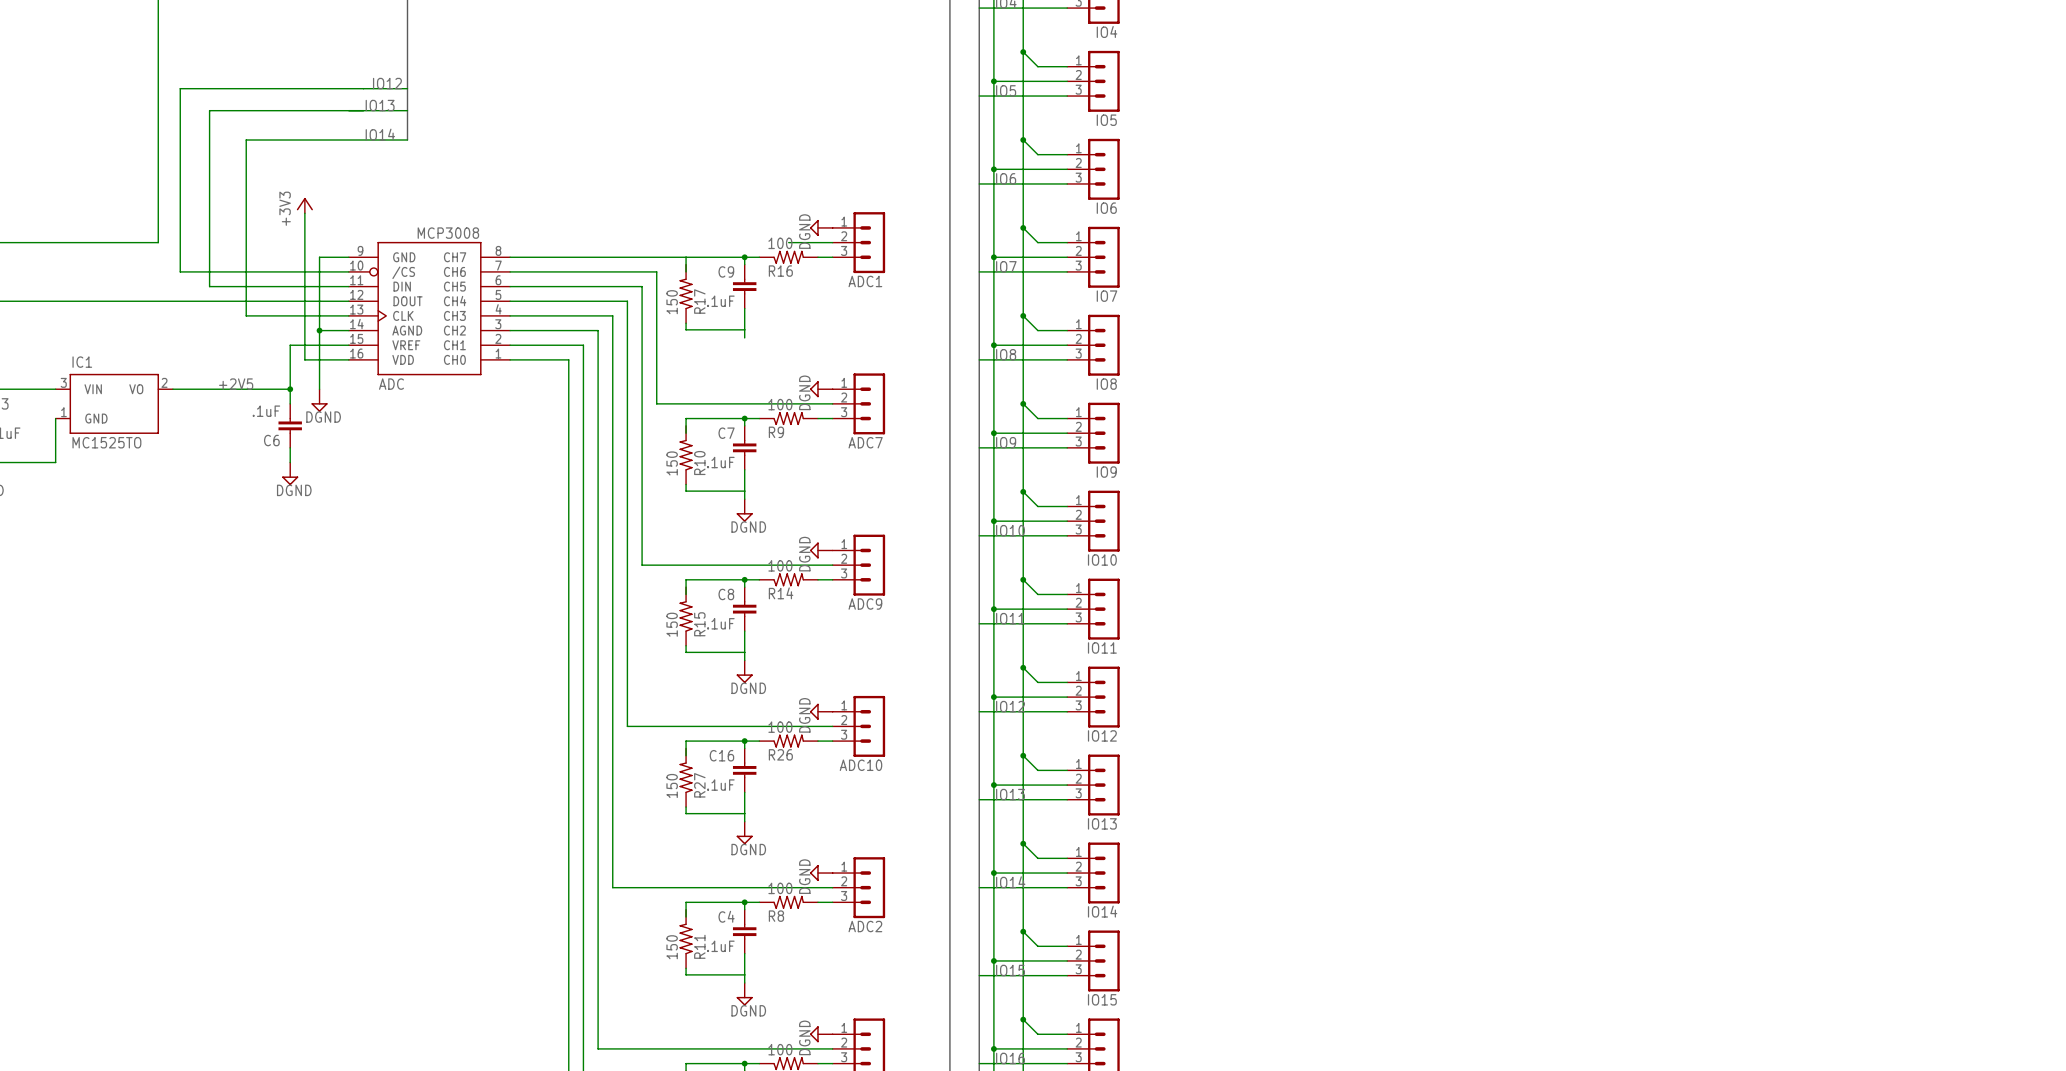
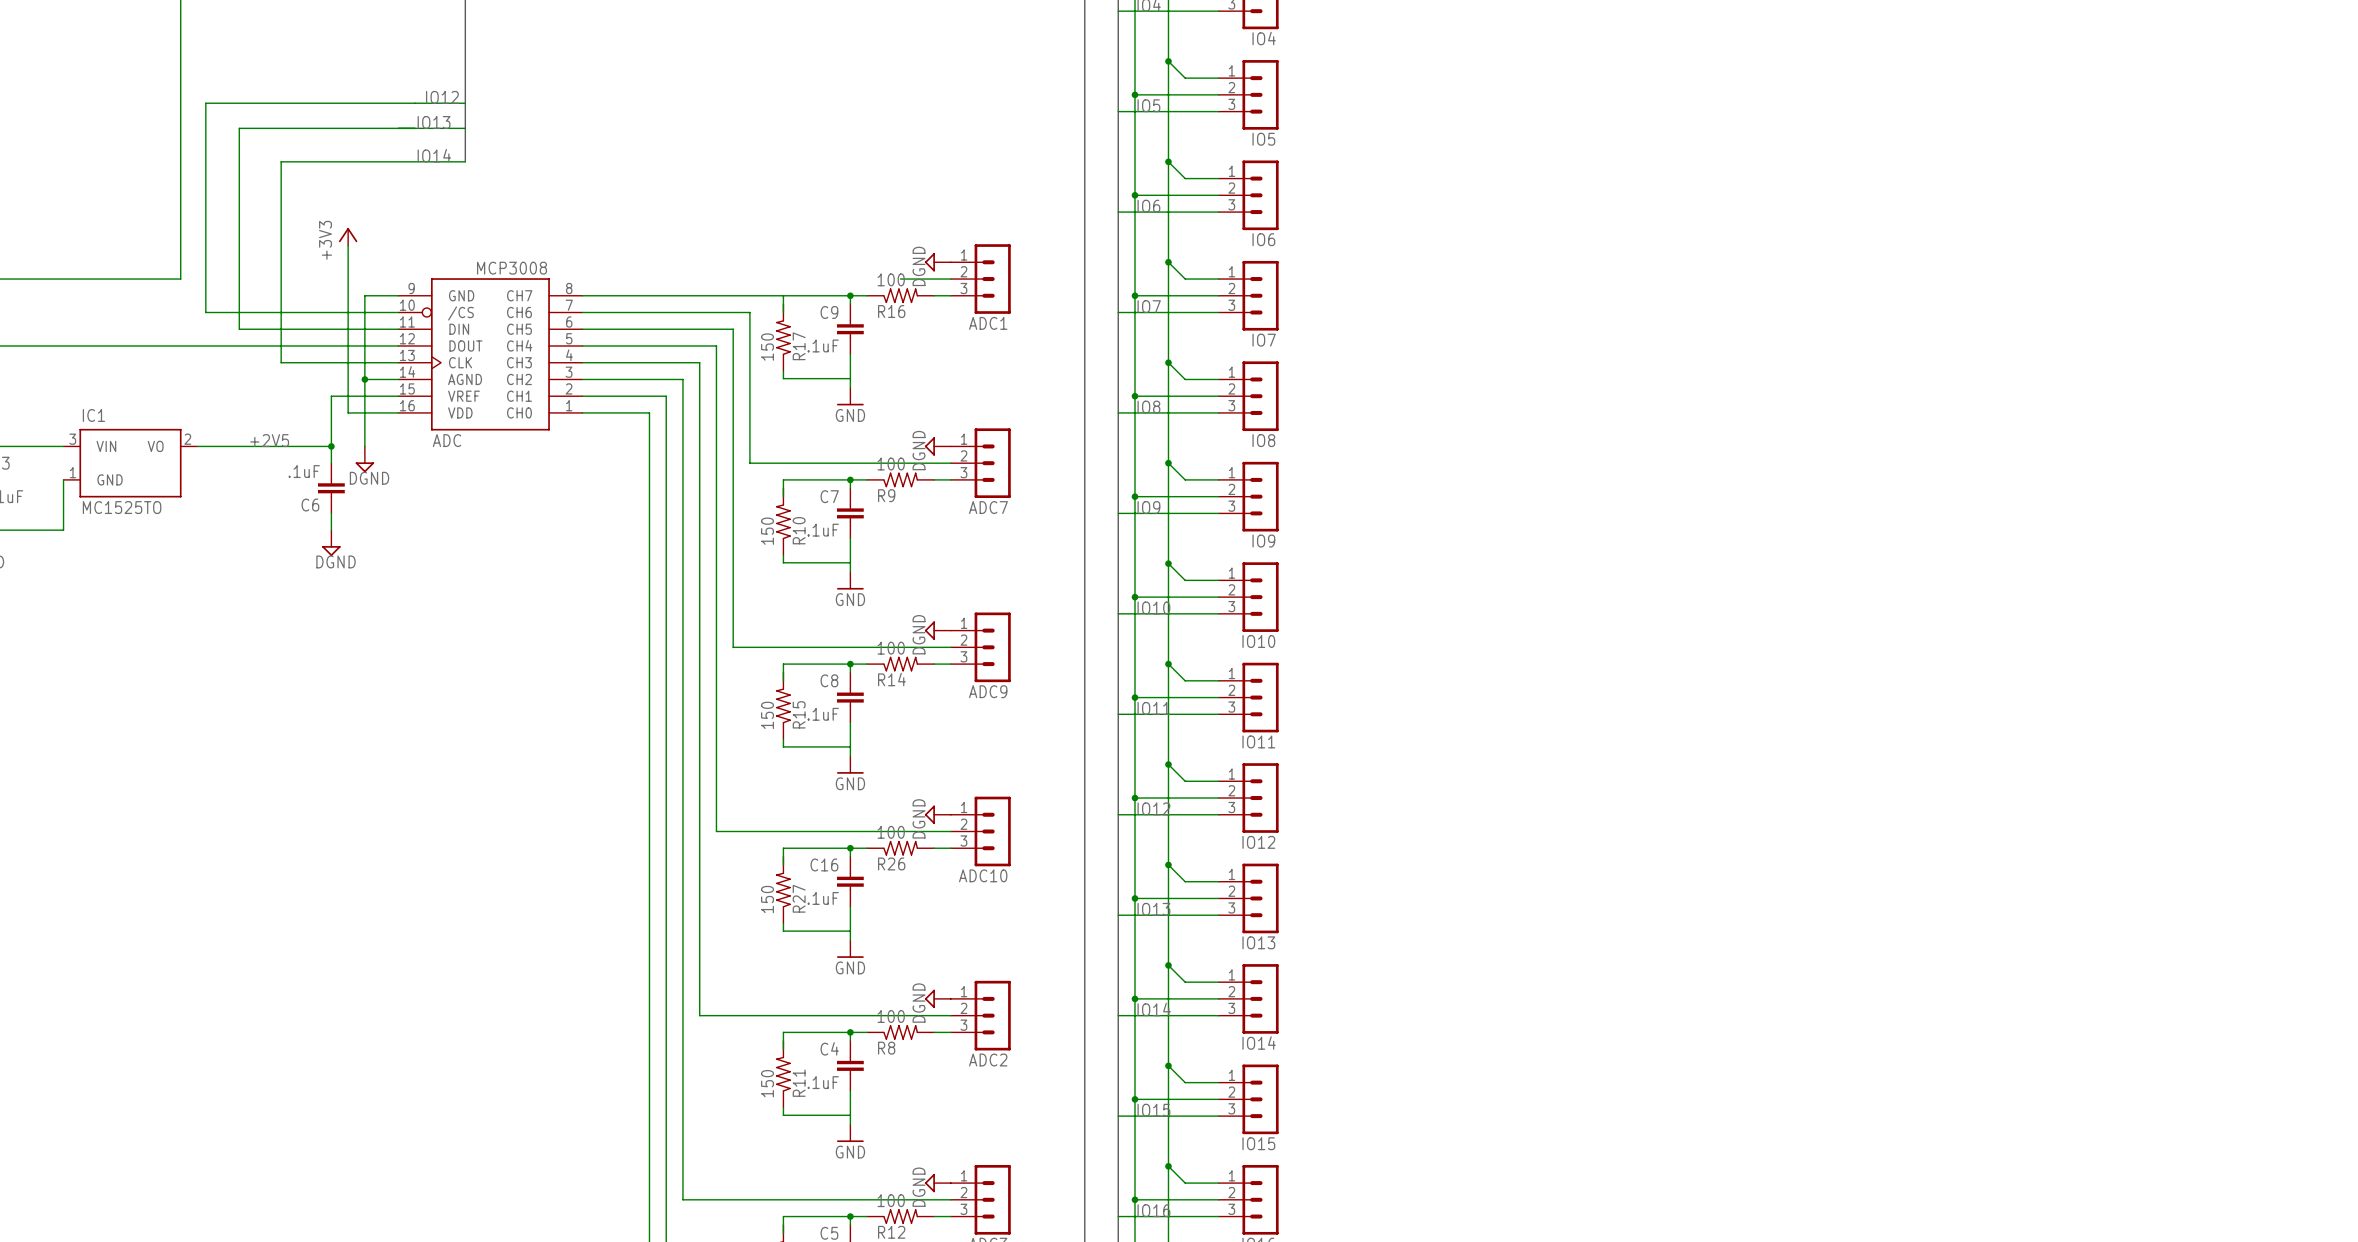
power symbol: none -> GND (850, 396)
power symbol: DGND (744, 510) -> GND (850, 580)
power symbol: DGND (744, 671) -> GND (850, 764)
power symbol: DGND (744, 833) -> GND (850, 949)
power symbol: DGND (744, 994) -> GND (850, 1133)

